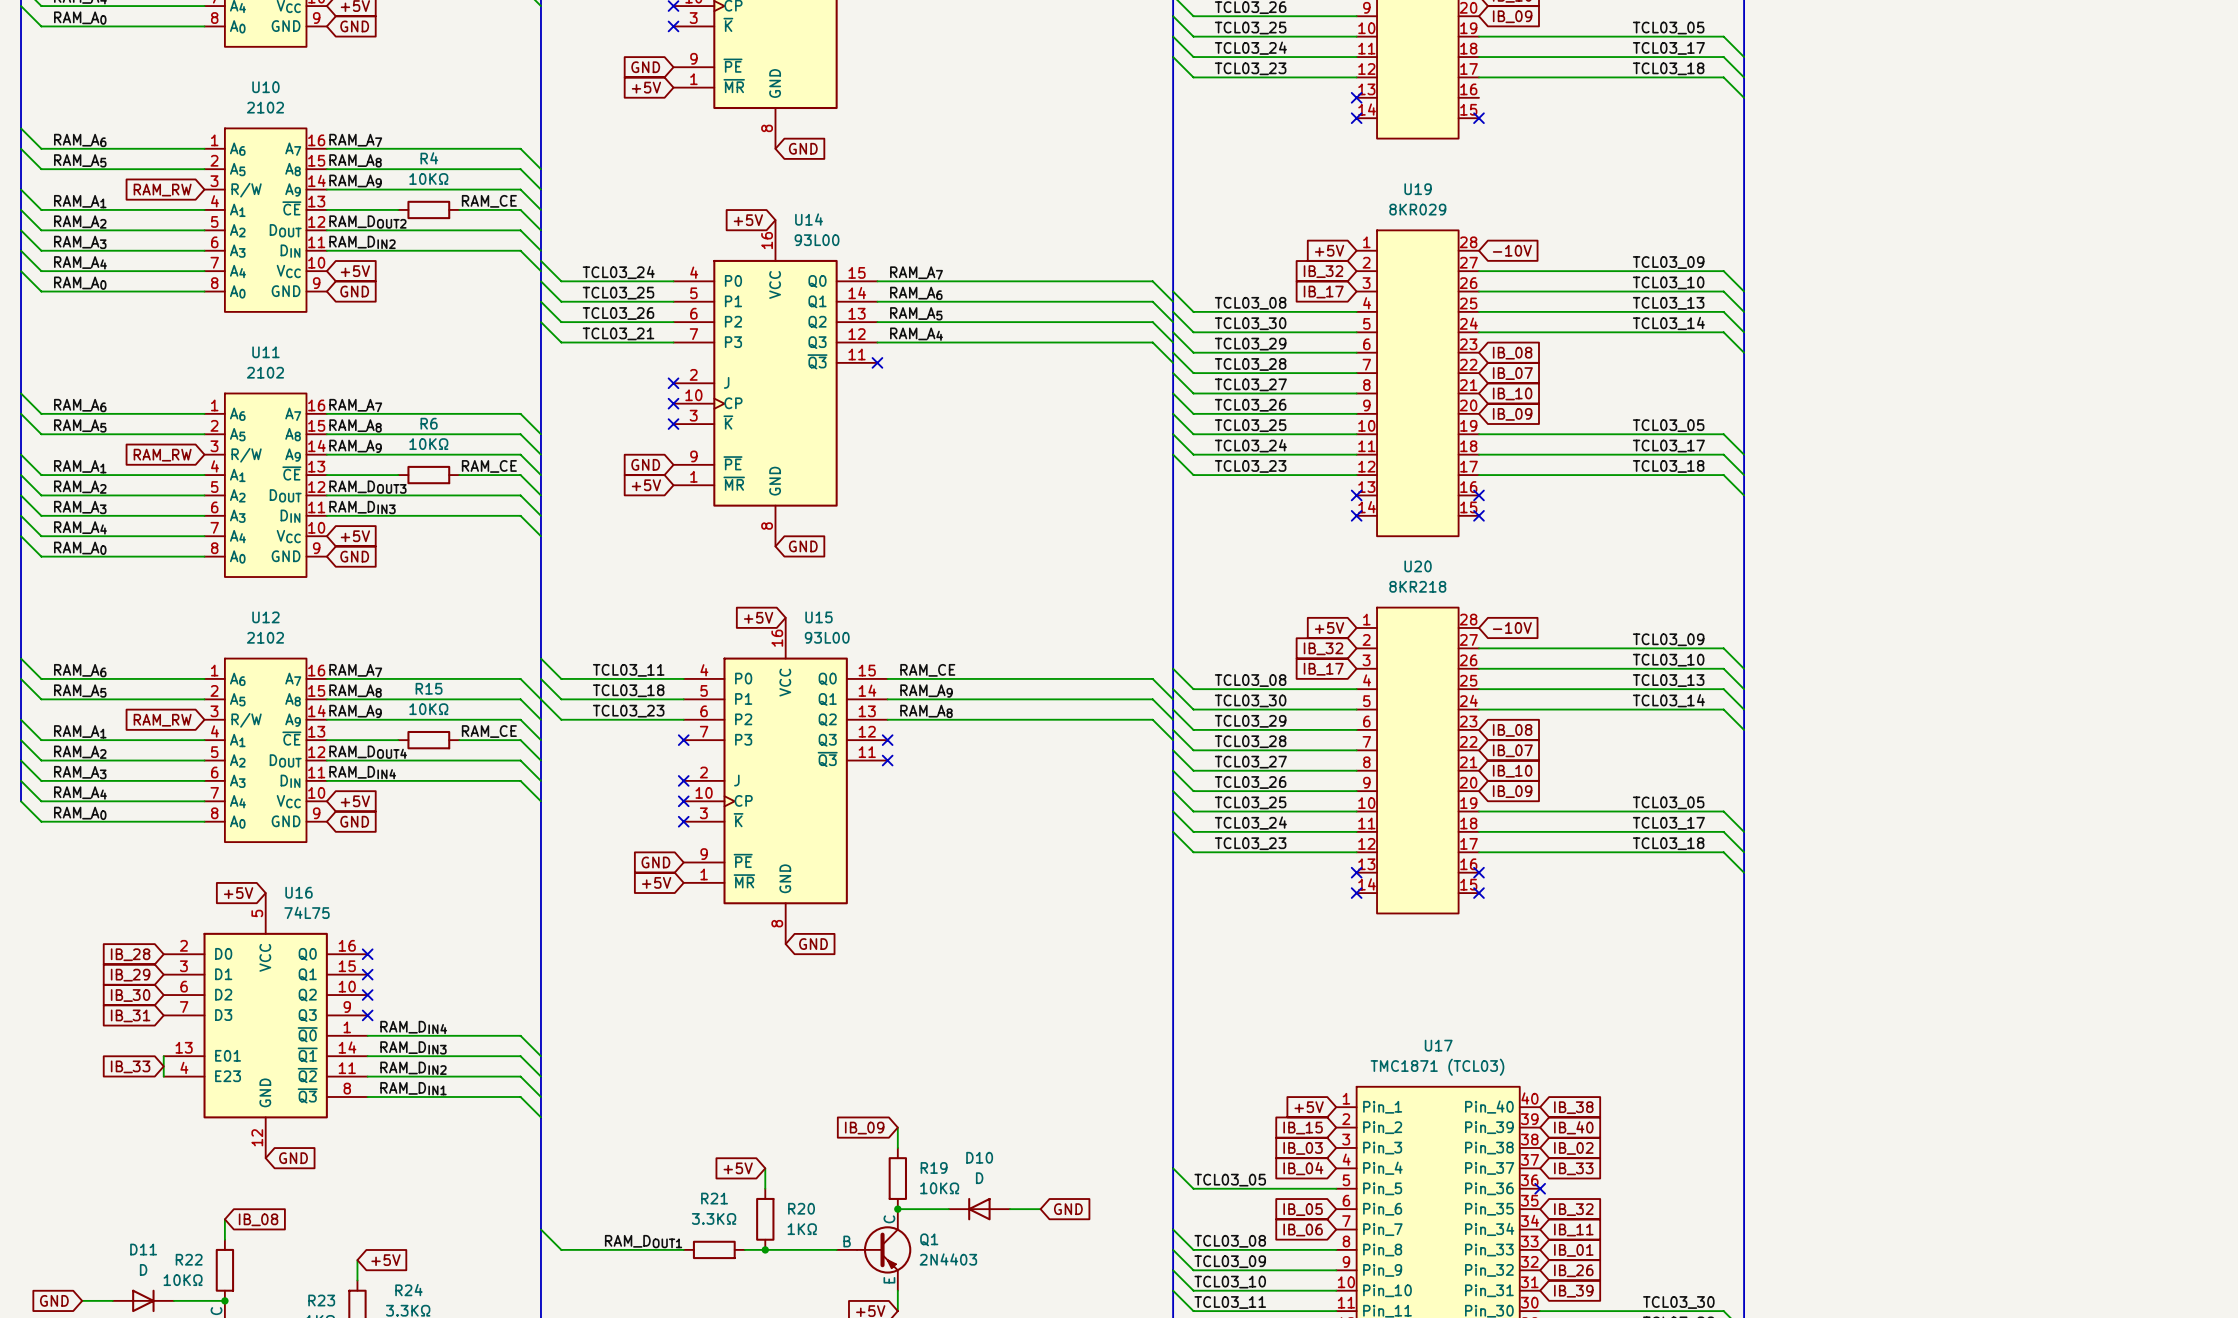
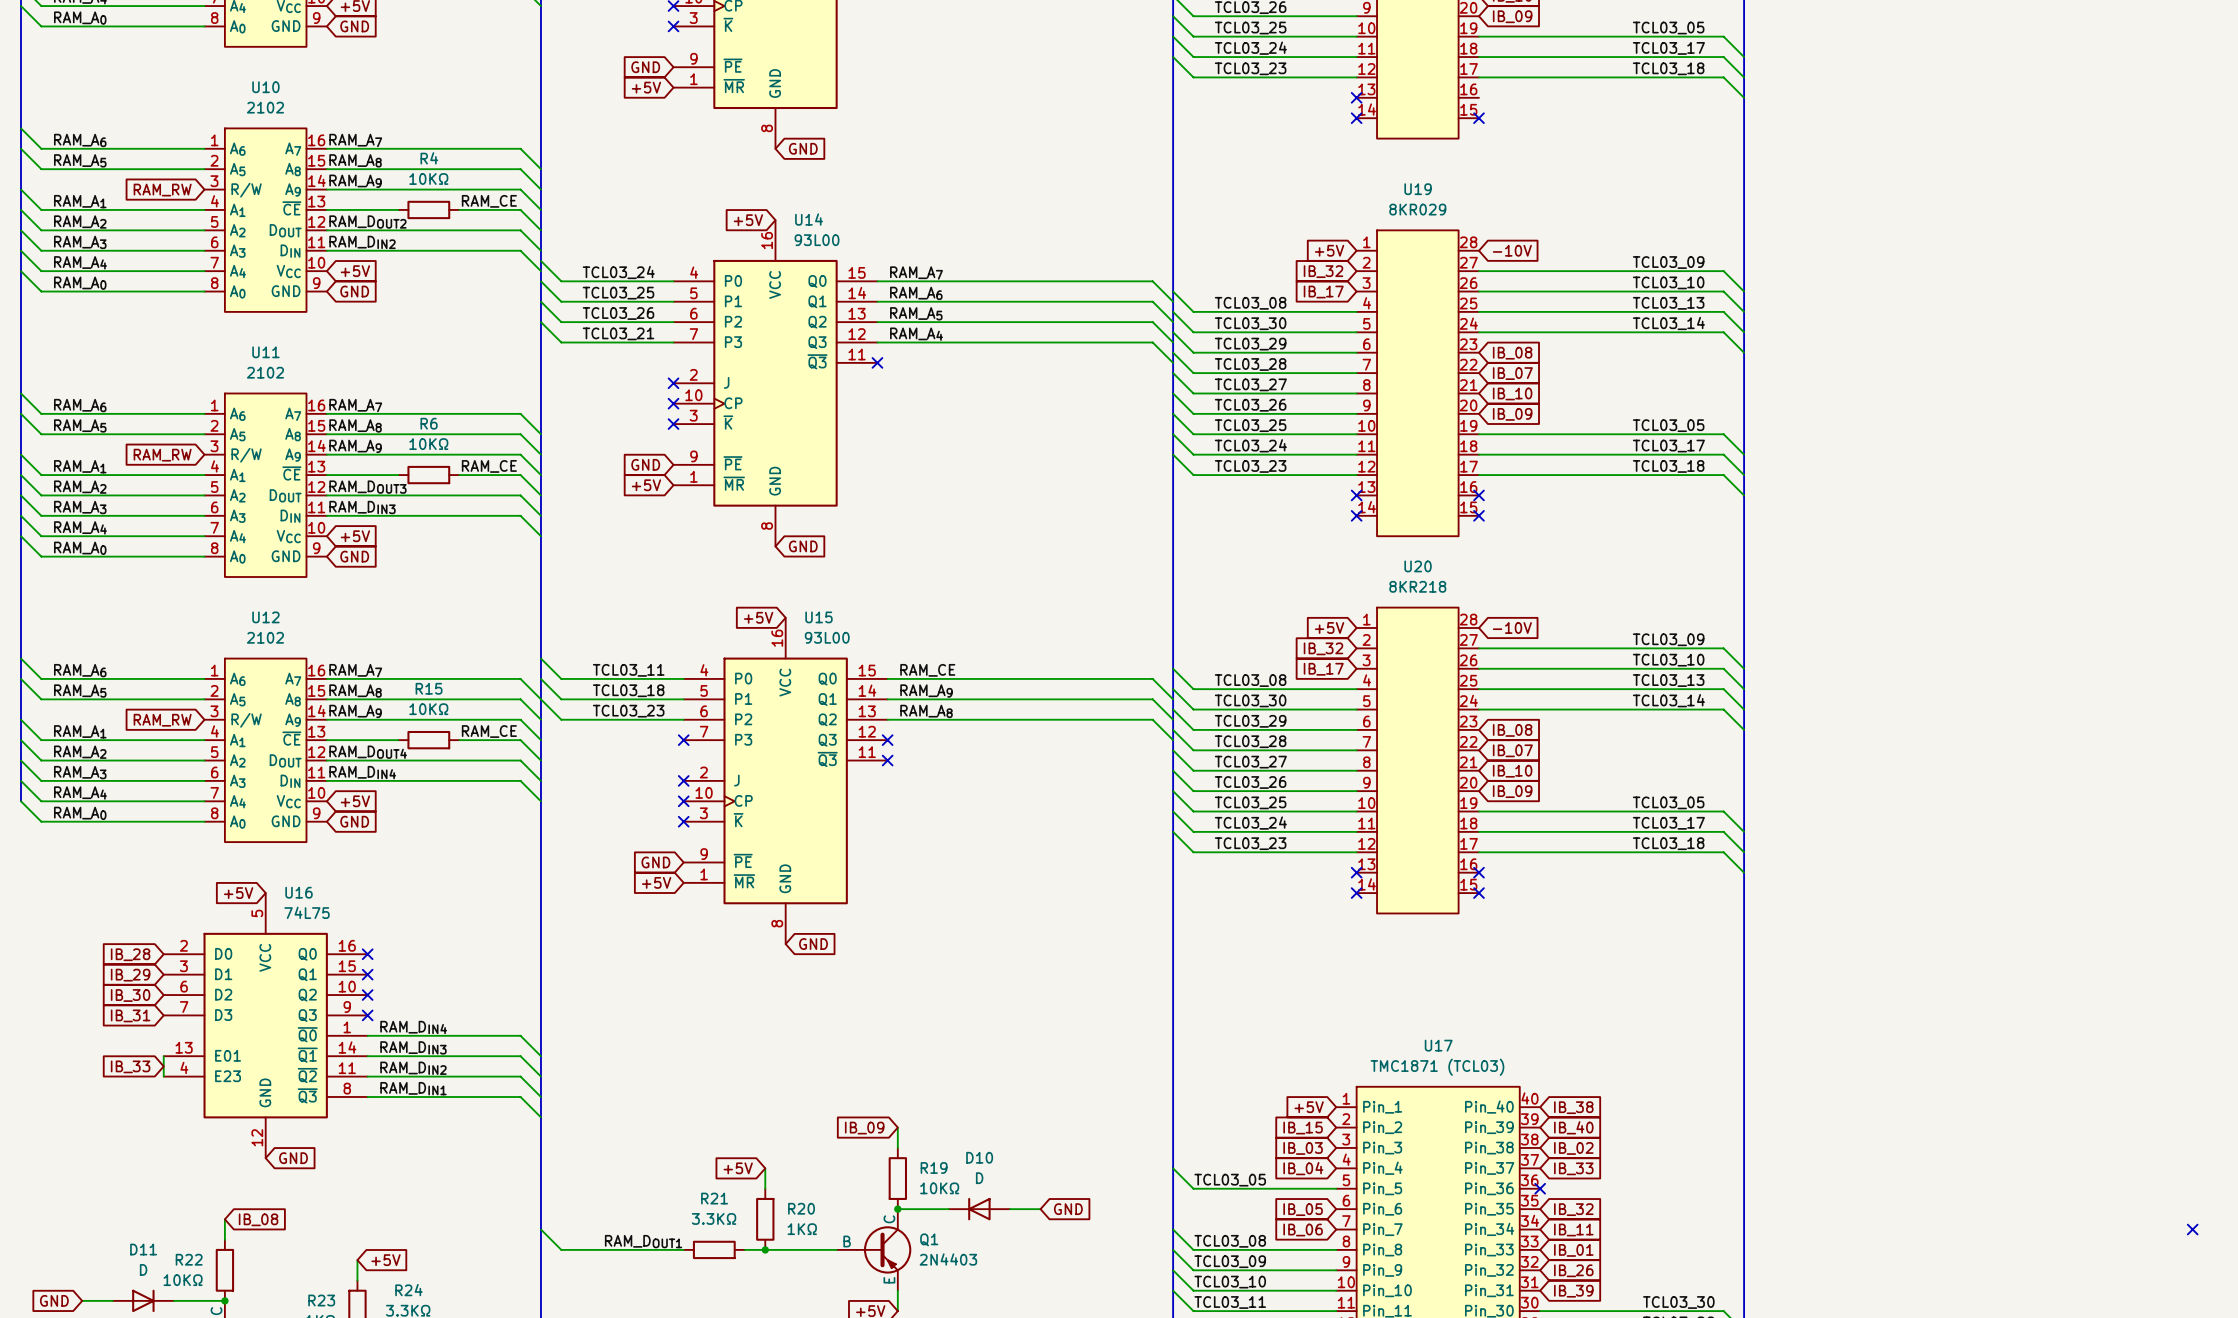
no-connect mark: none -> (2192, 1229)

